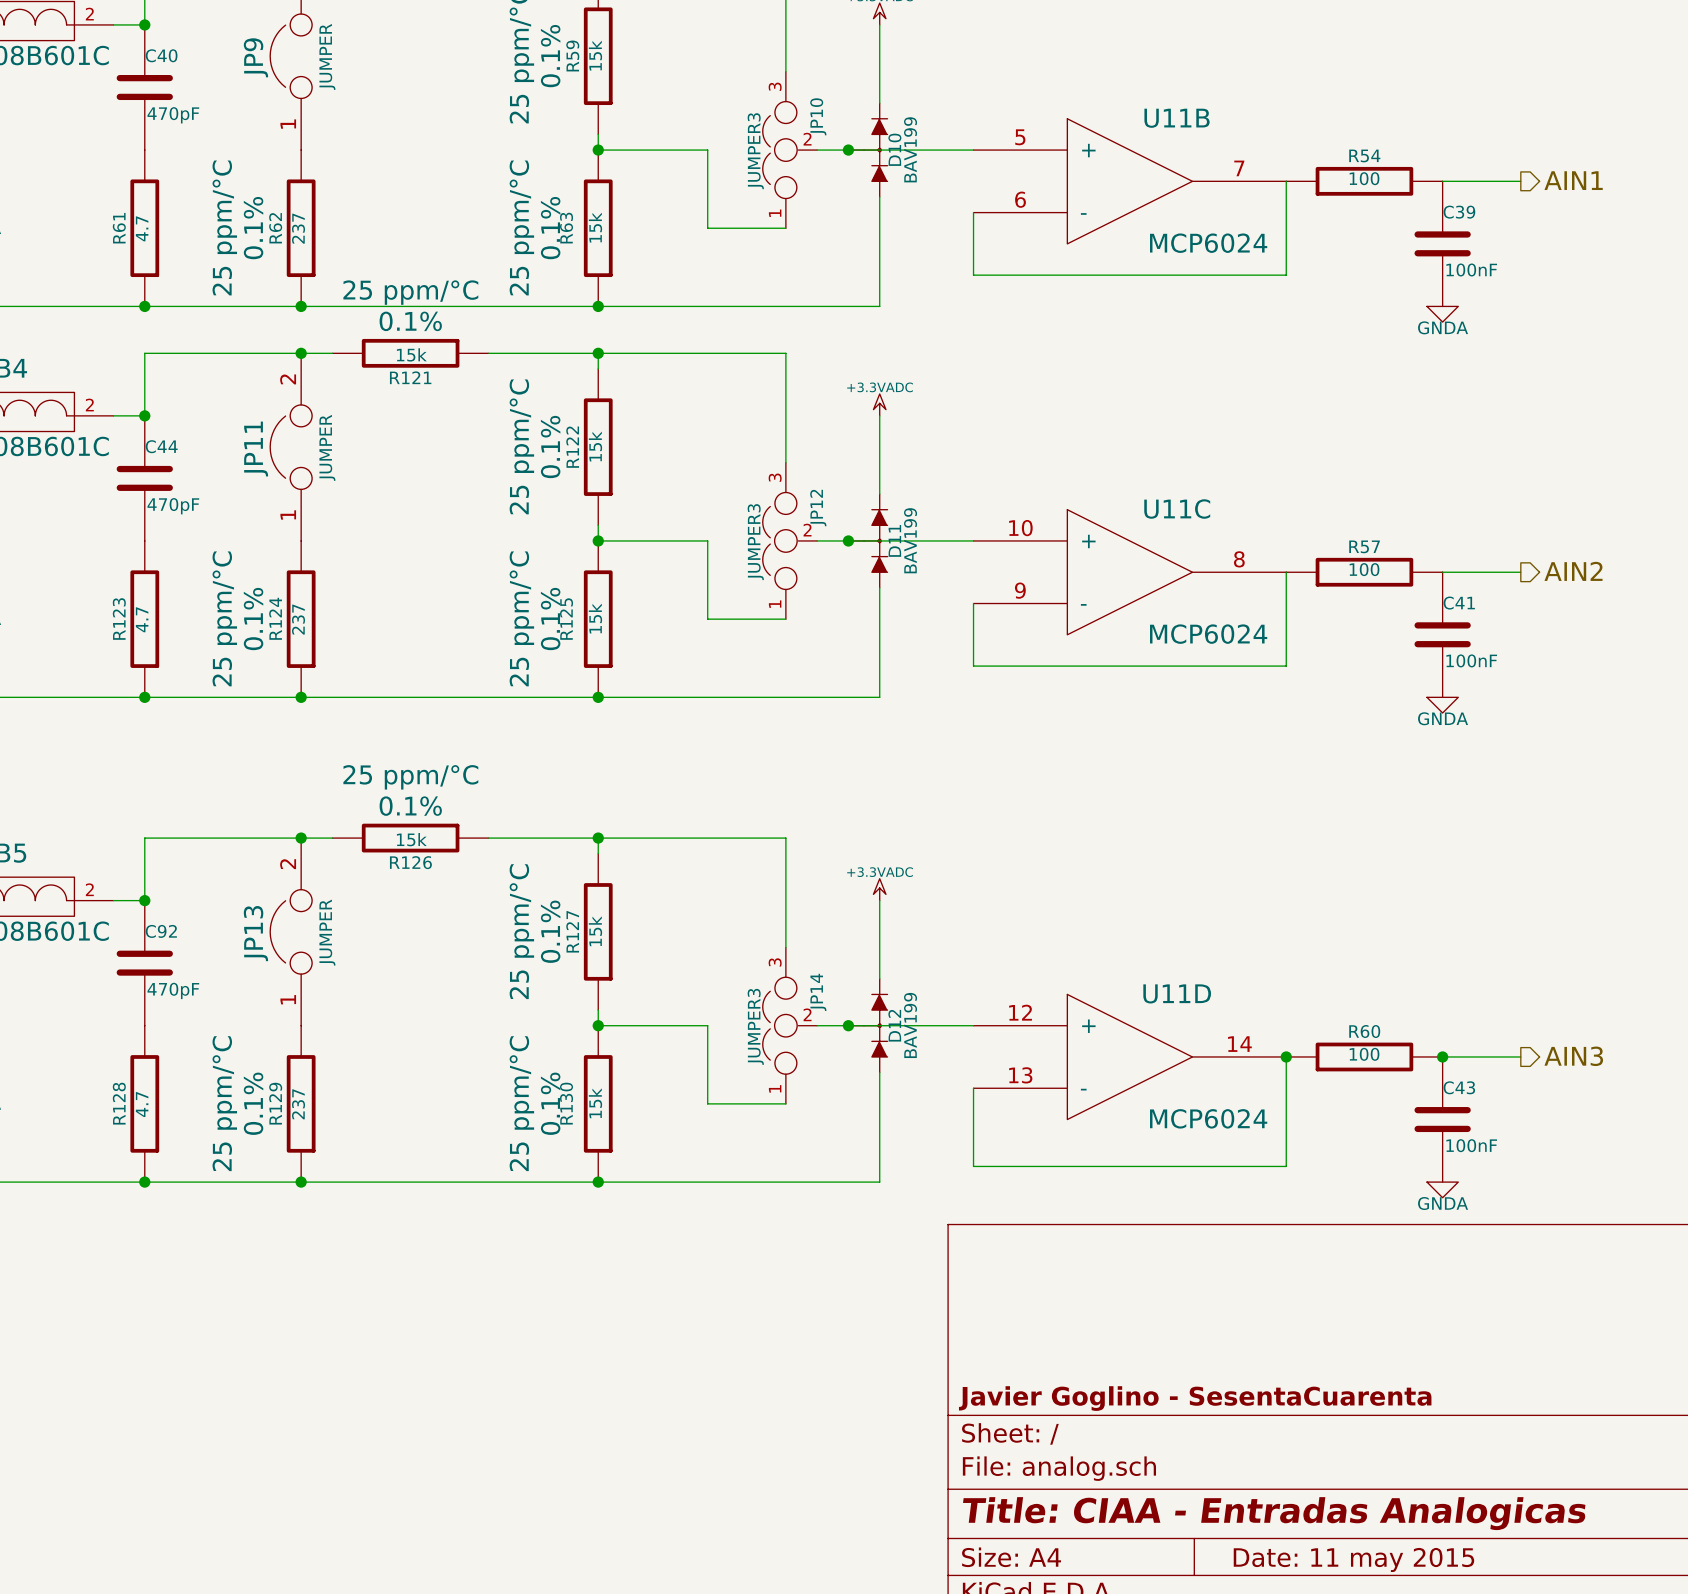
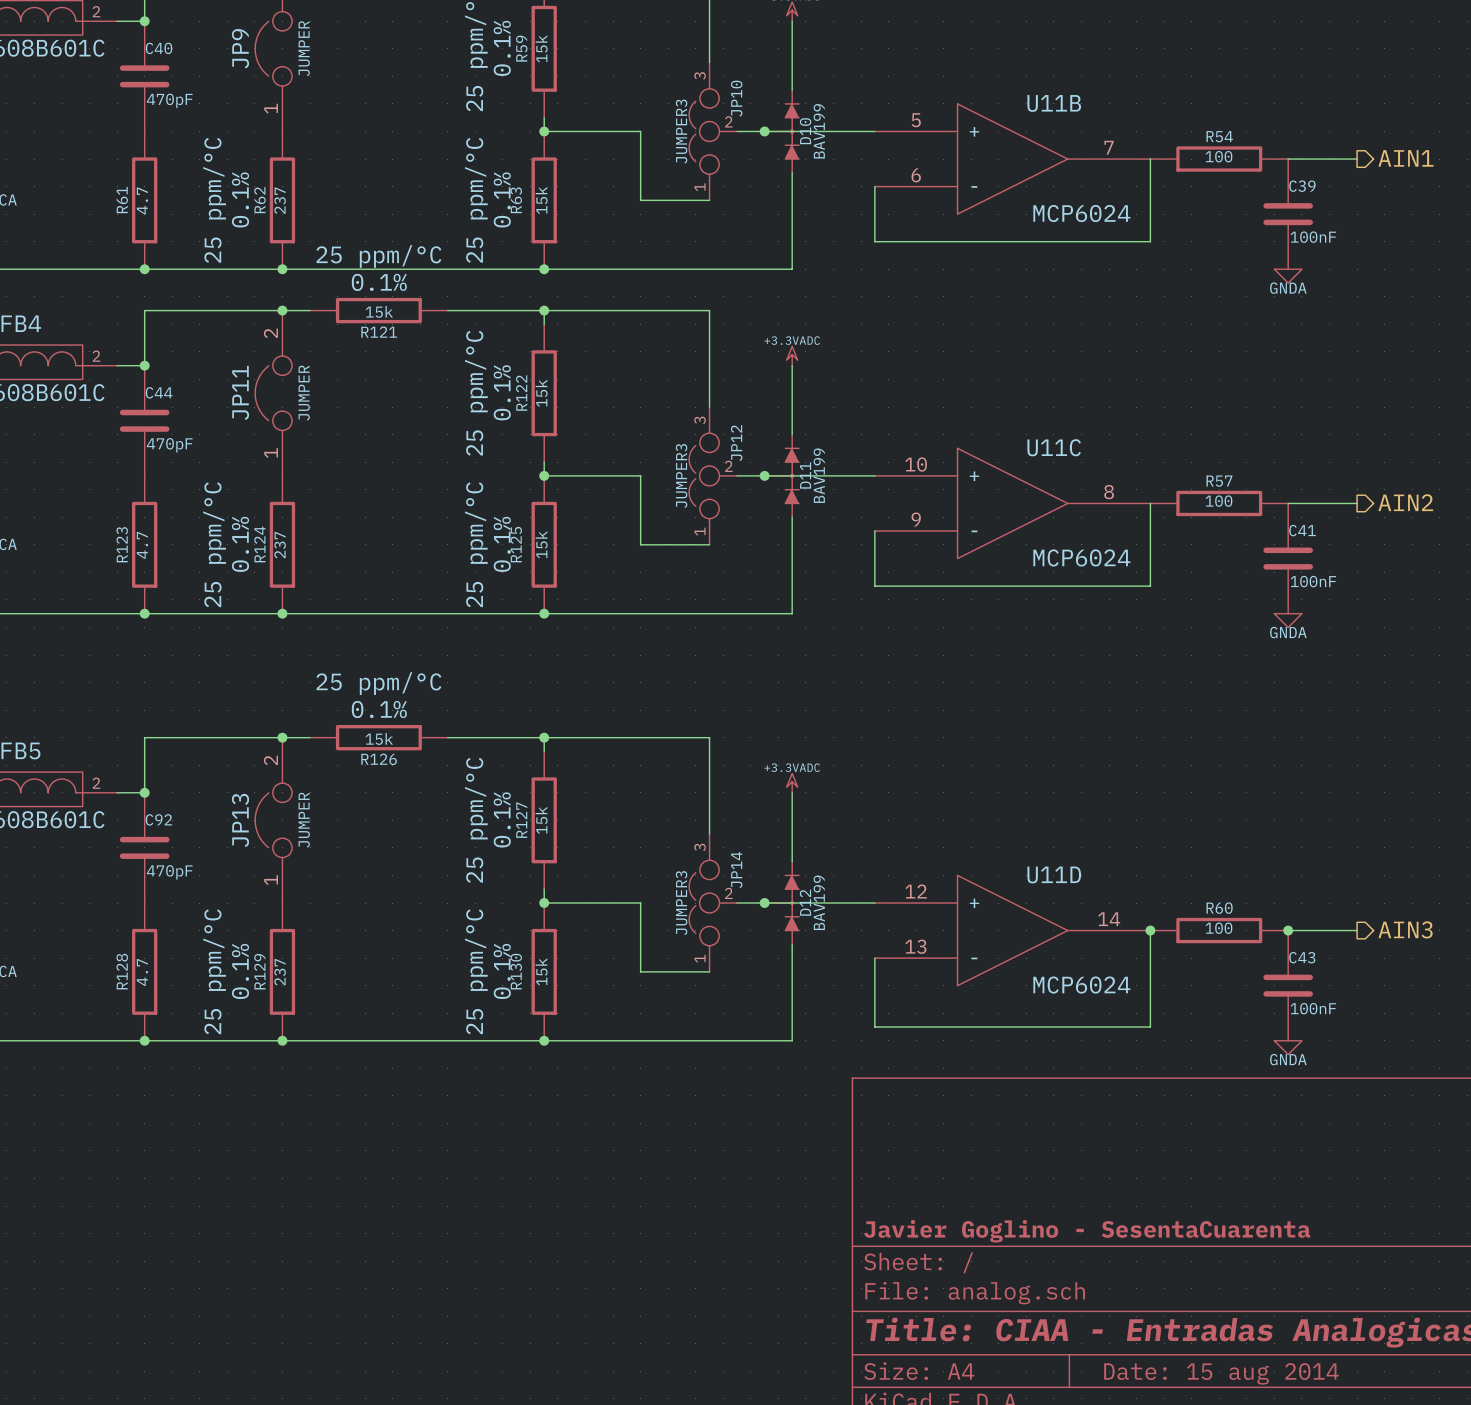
title block: Date: 11 may 2015 (1353, 1559) -> Date: 15 aug 2014 (1221, 1373)

